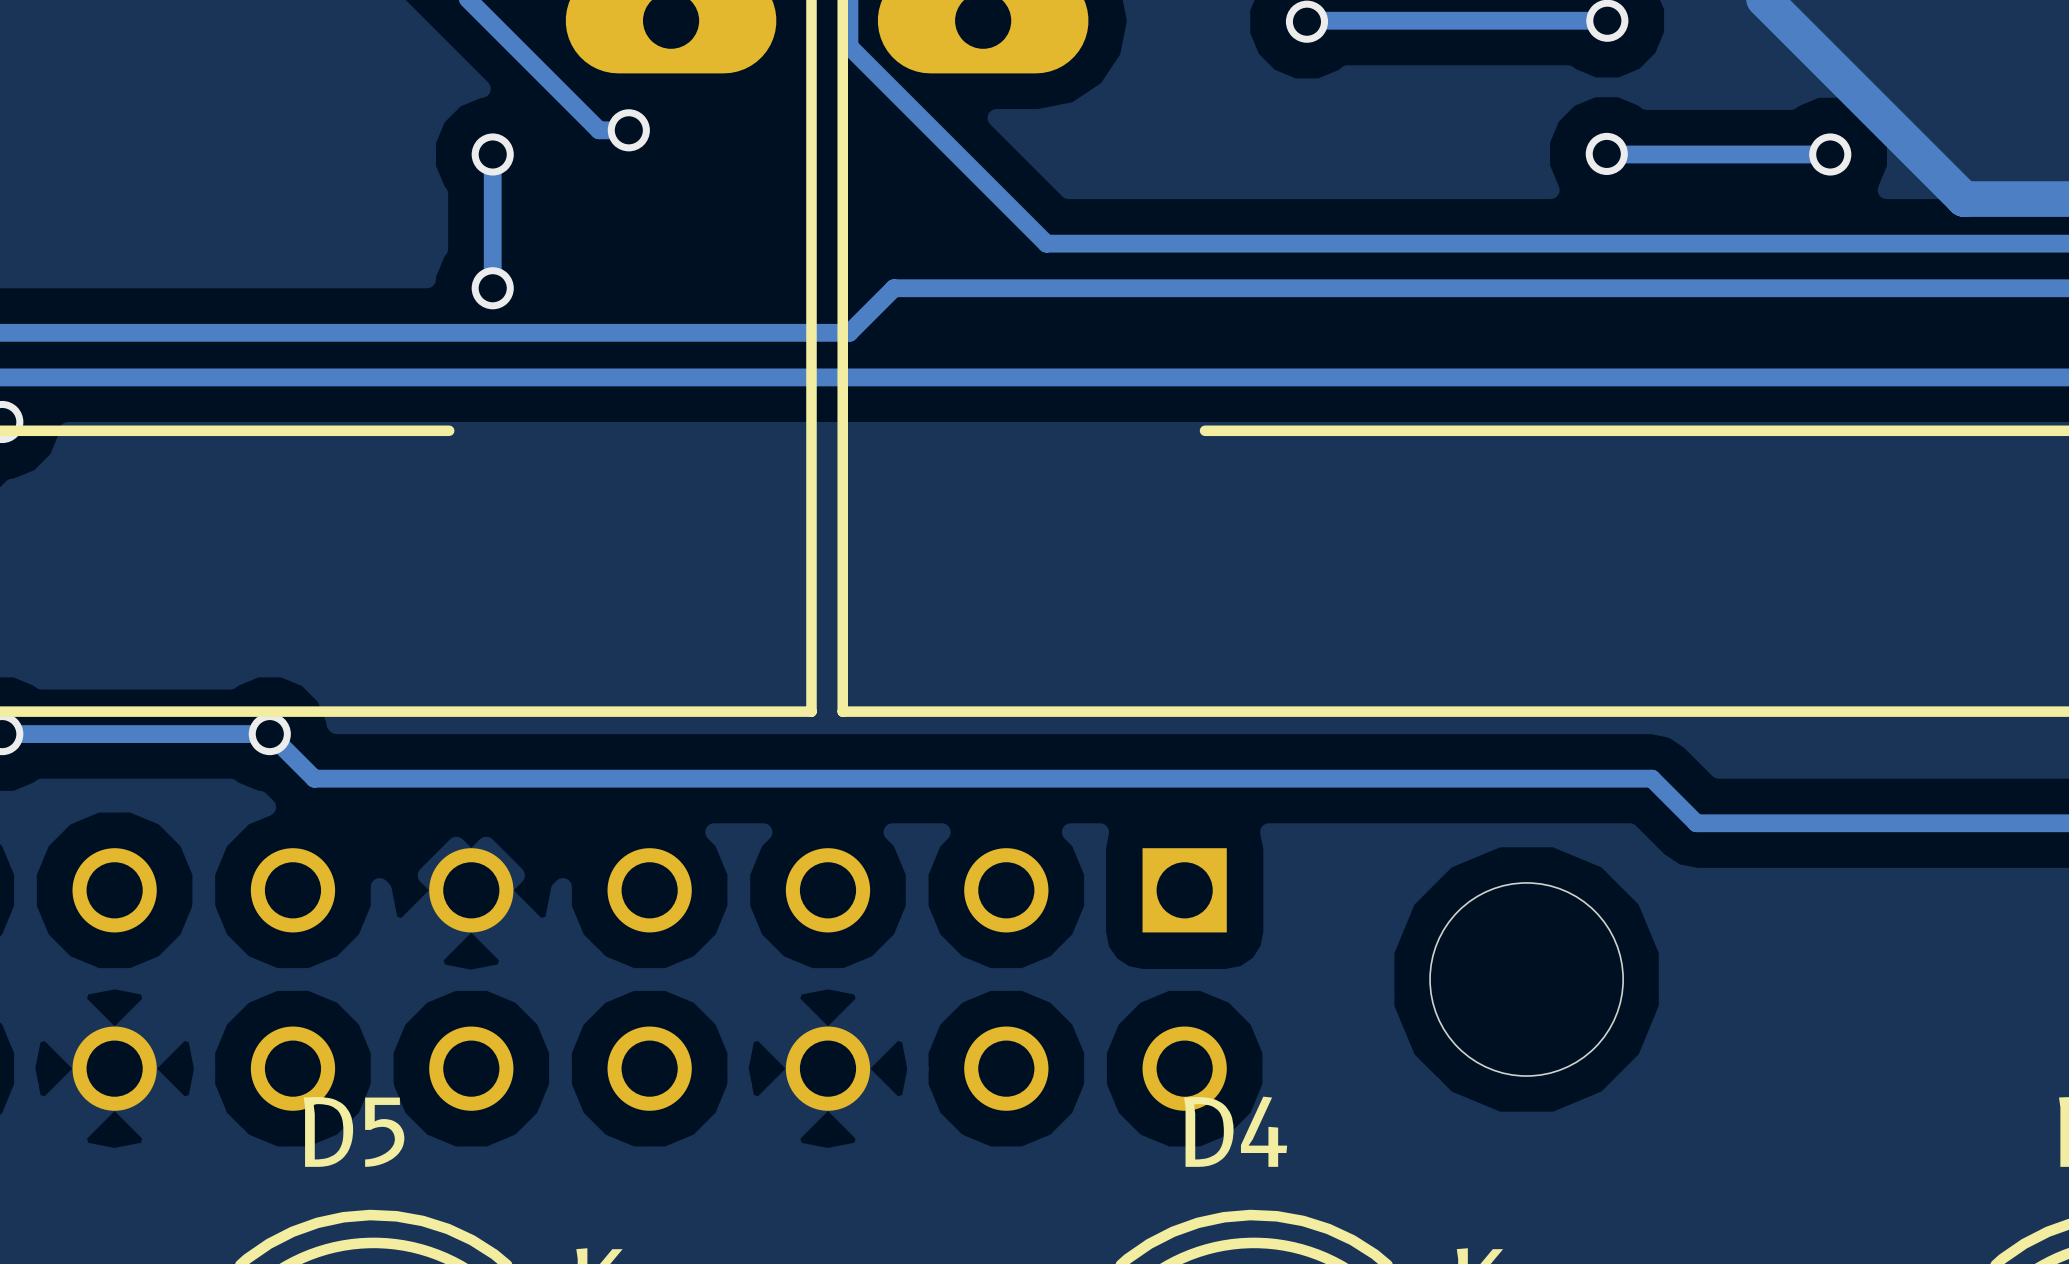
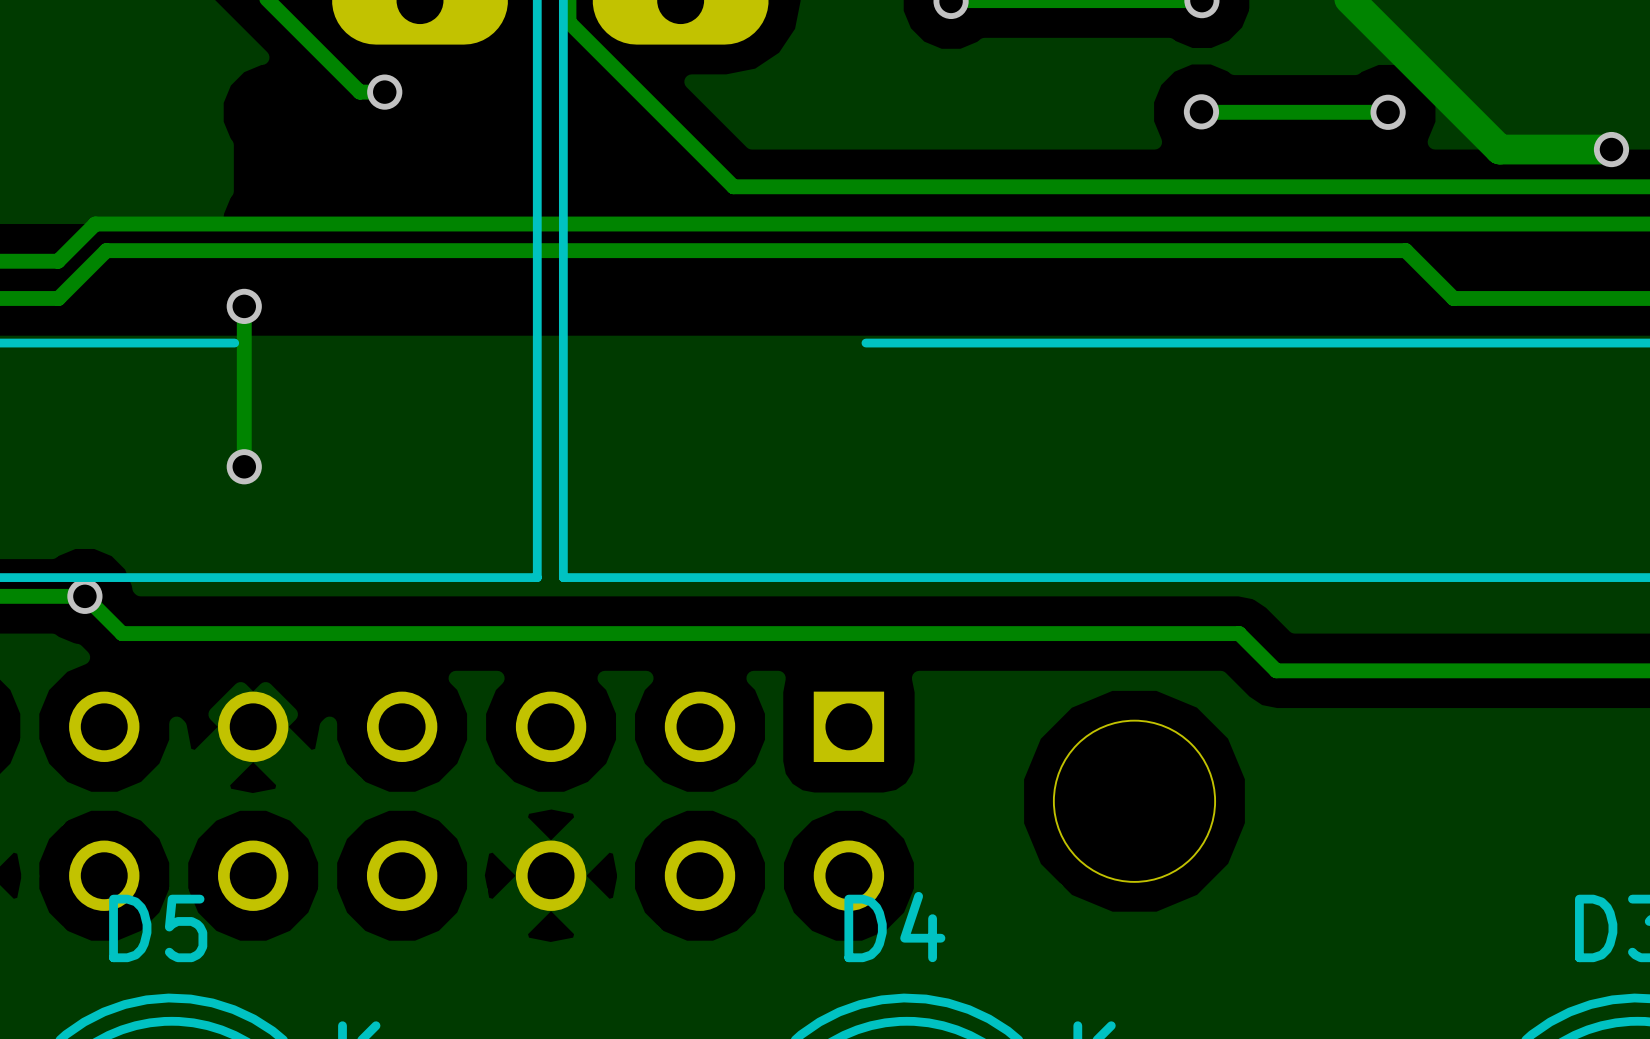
track: (492, 154) (492, 288) -> none
via: (492, 154) -> none
via position: (492, 288) -> (244, 306)
track: (893, 288) (849, 332) (237, 332) -> (606, 224) (95, 224) (58, 261)
track: (1908, 377) (238, 377) -> (1453, 298) (1405, 250) (106, 250) (58, 298)
track: none -> (244, 306) (244, 466)
via: none -> (244, 466)

